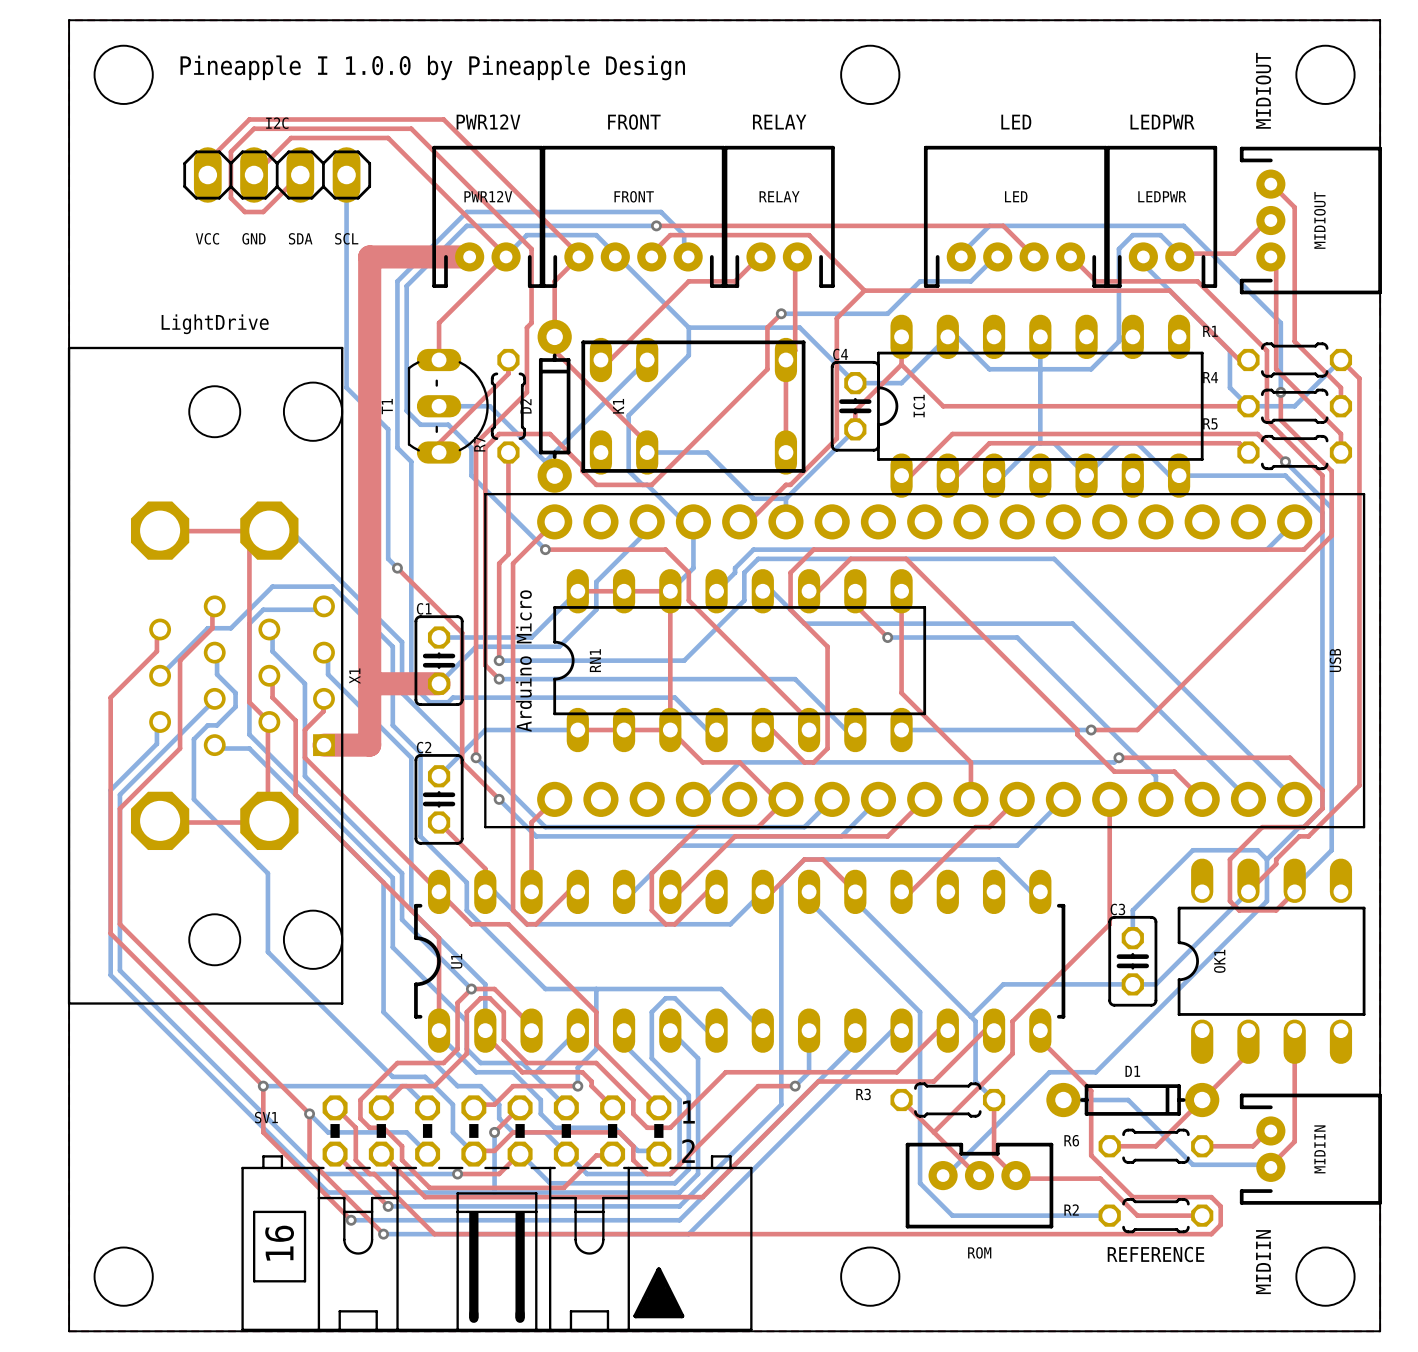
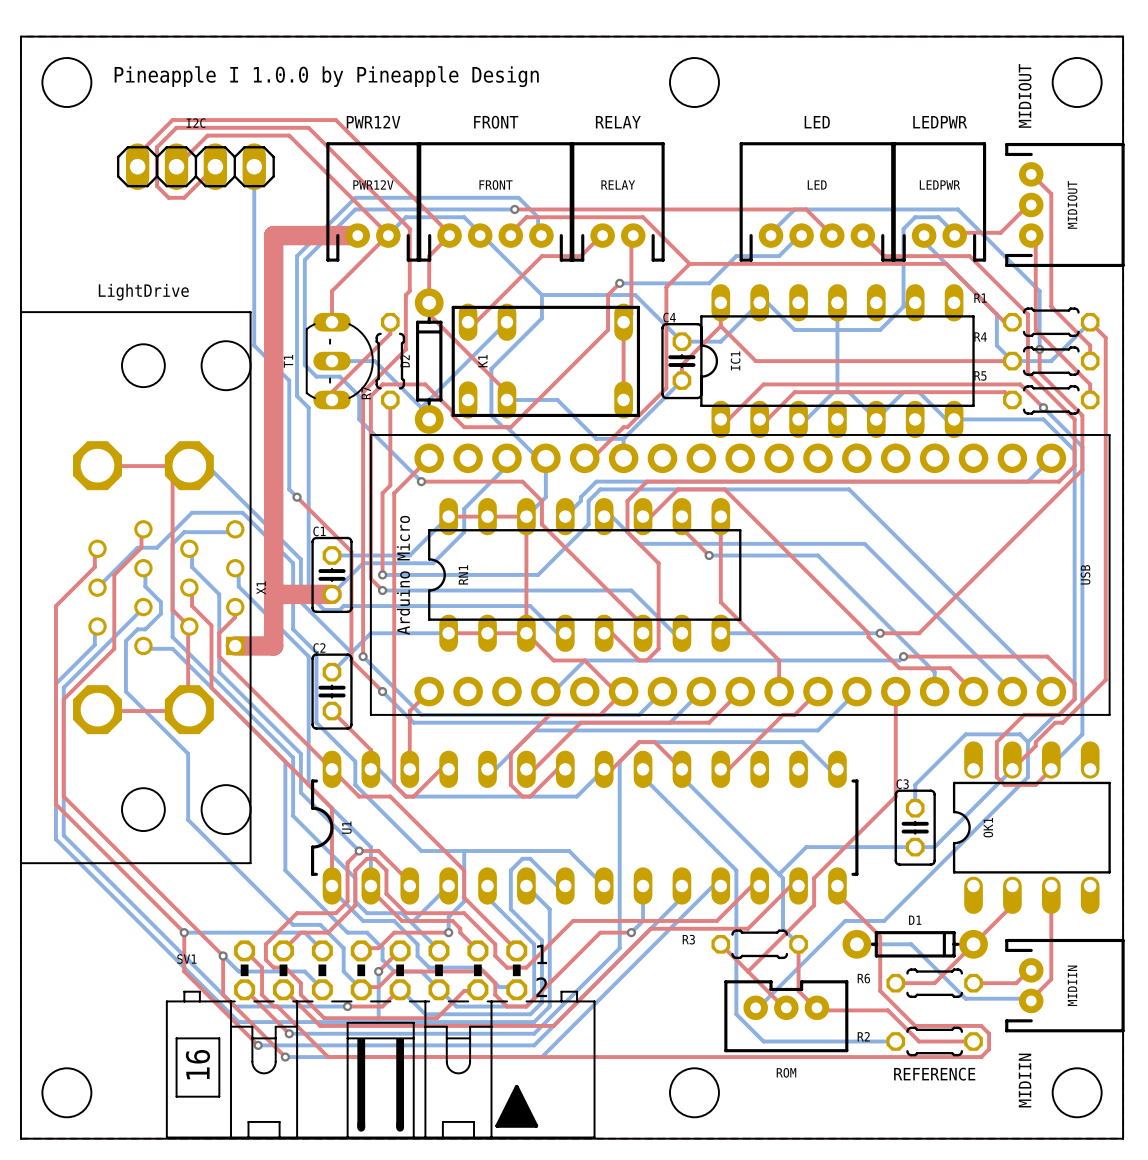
text: VCC (207, 238) -> none
text: GND (253, 238) -> none
text: SDA (300, 238) -> none
text: SCL (346, 238) -> none

